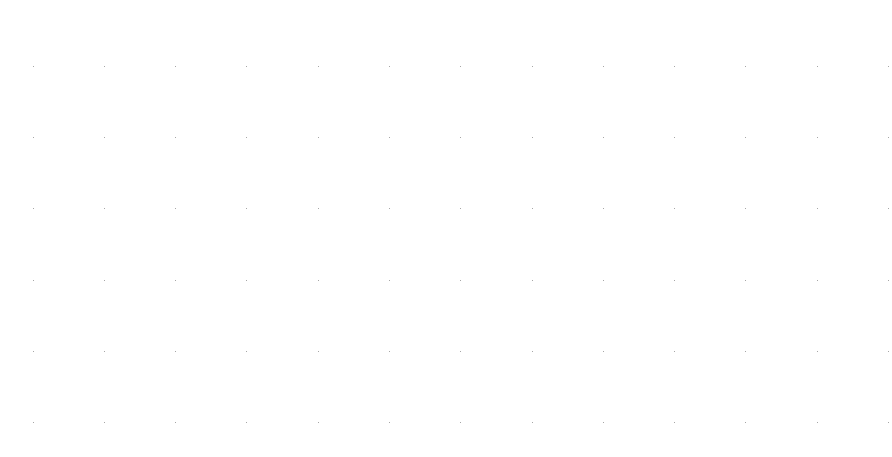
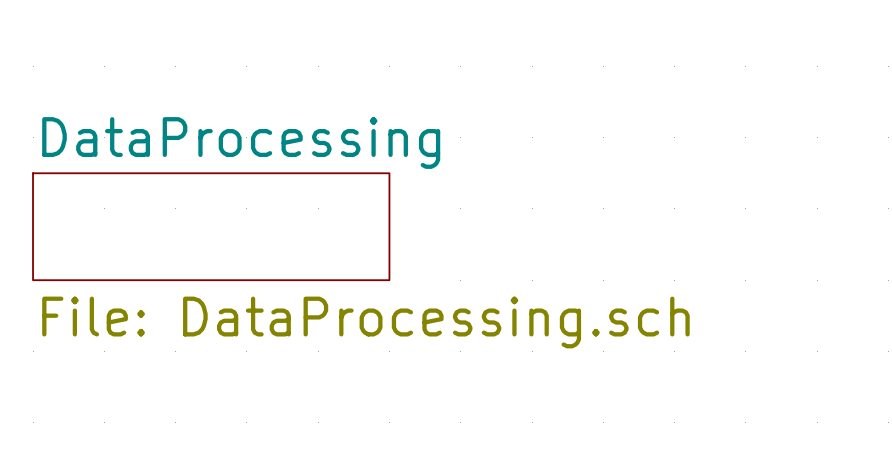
sheet DataProcessing: none -> File: DataProcessing.sch (211, 226)

